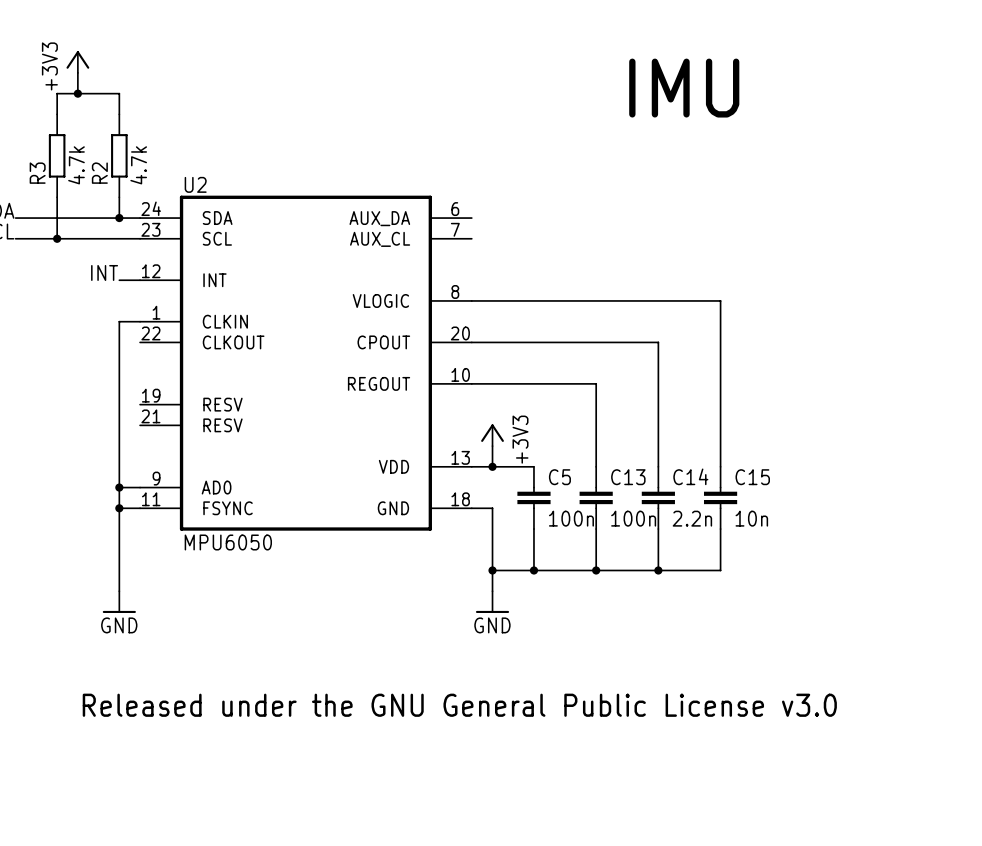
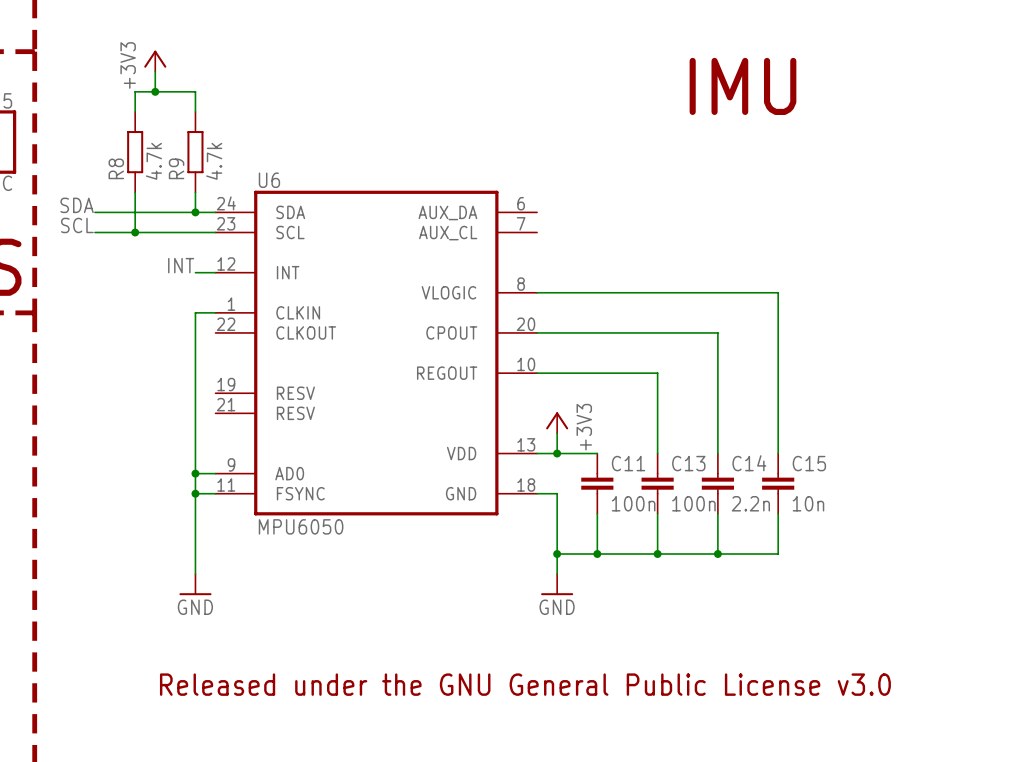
R3 name: R3 (37, 173) -> R8 (116, 168)
R2 name: R2 (99, 173) -> R9 (176, 168)
U2 name: U2 (195, 184) -> U6 (269, 180)
C5 name: C5 (559, 477) -> C11 (628, 463)

